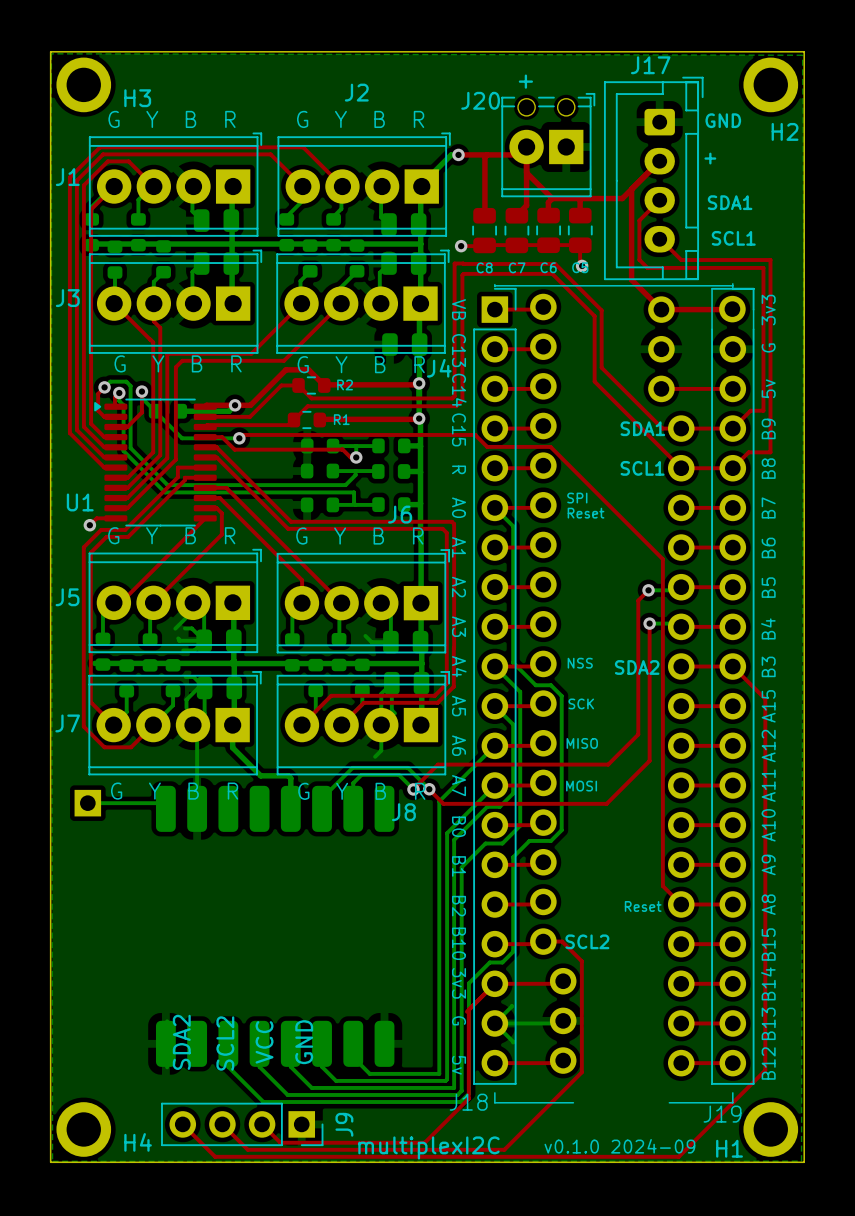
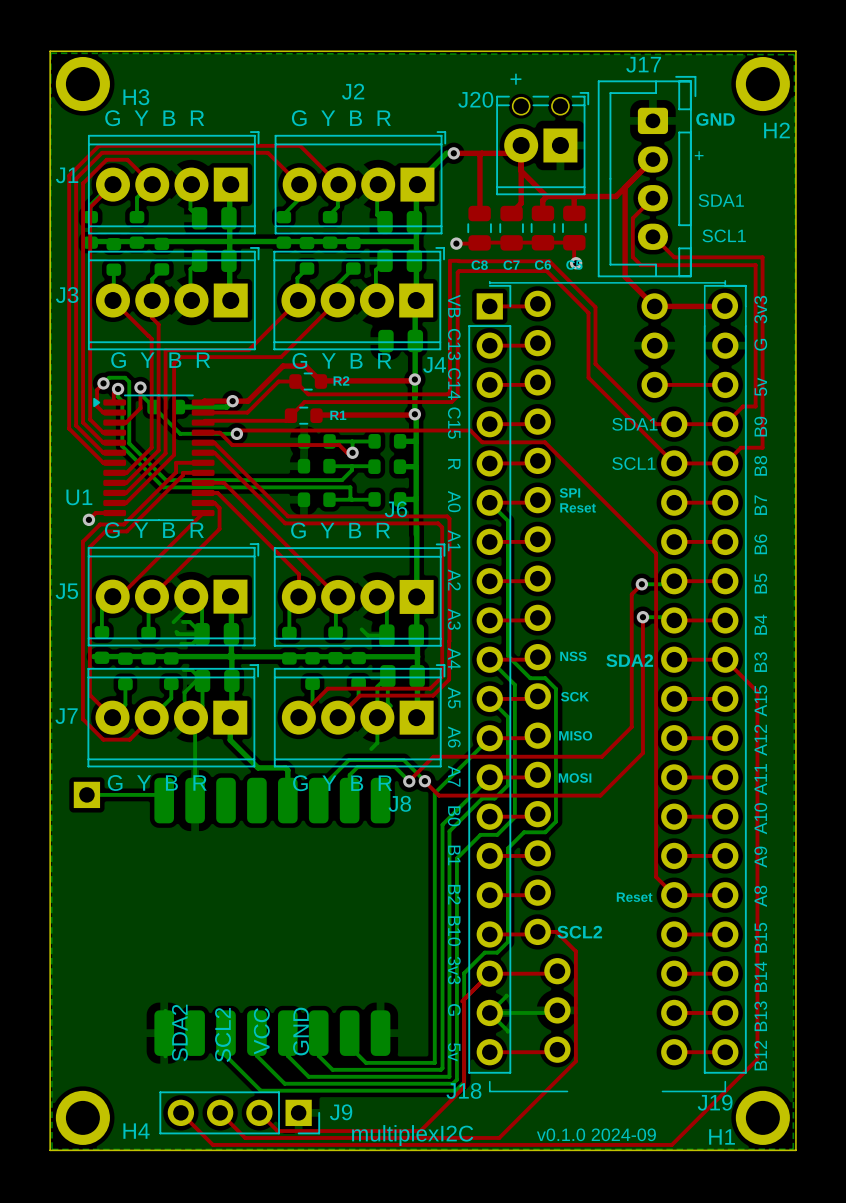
J9 name rotation: 0° (344, 1124) -> 90° clockwise (341, 1112)

